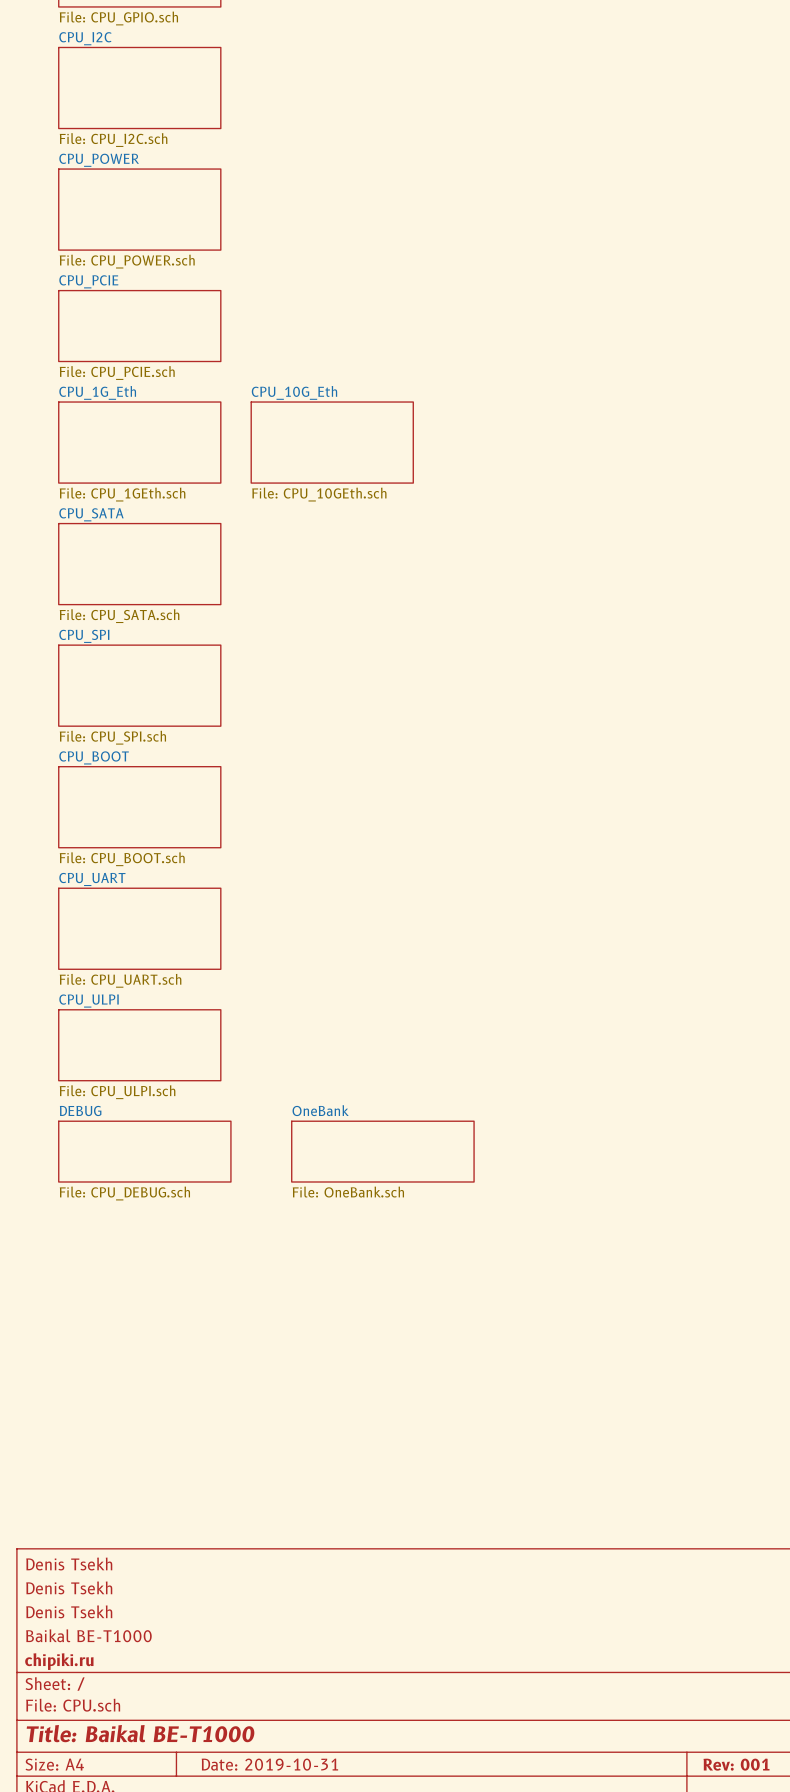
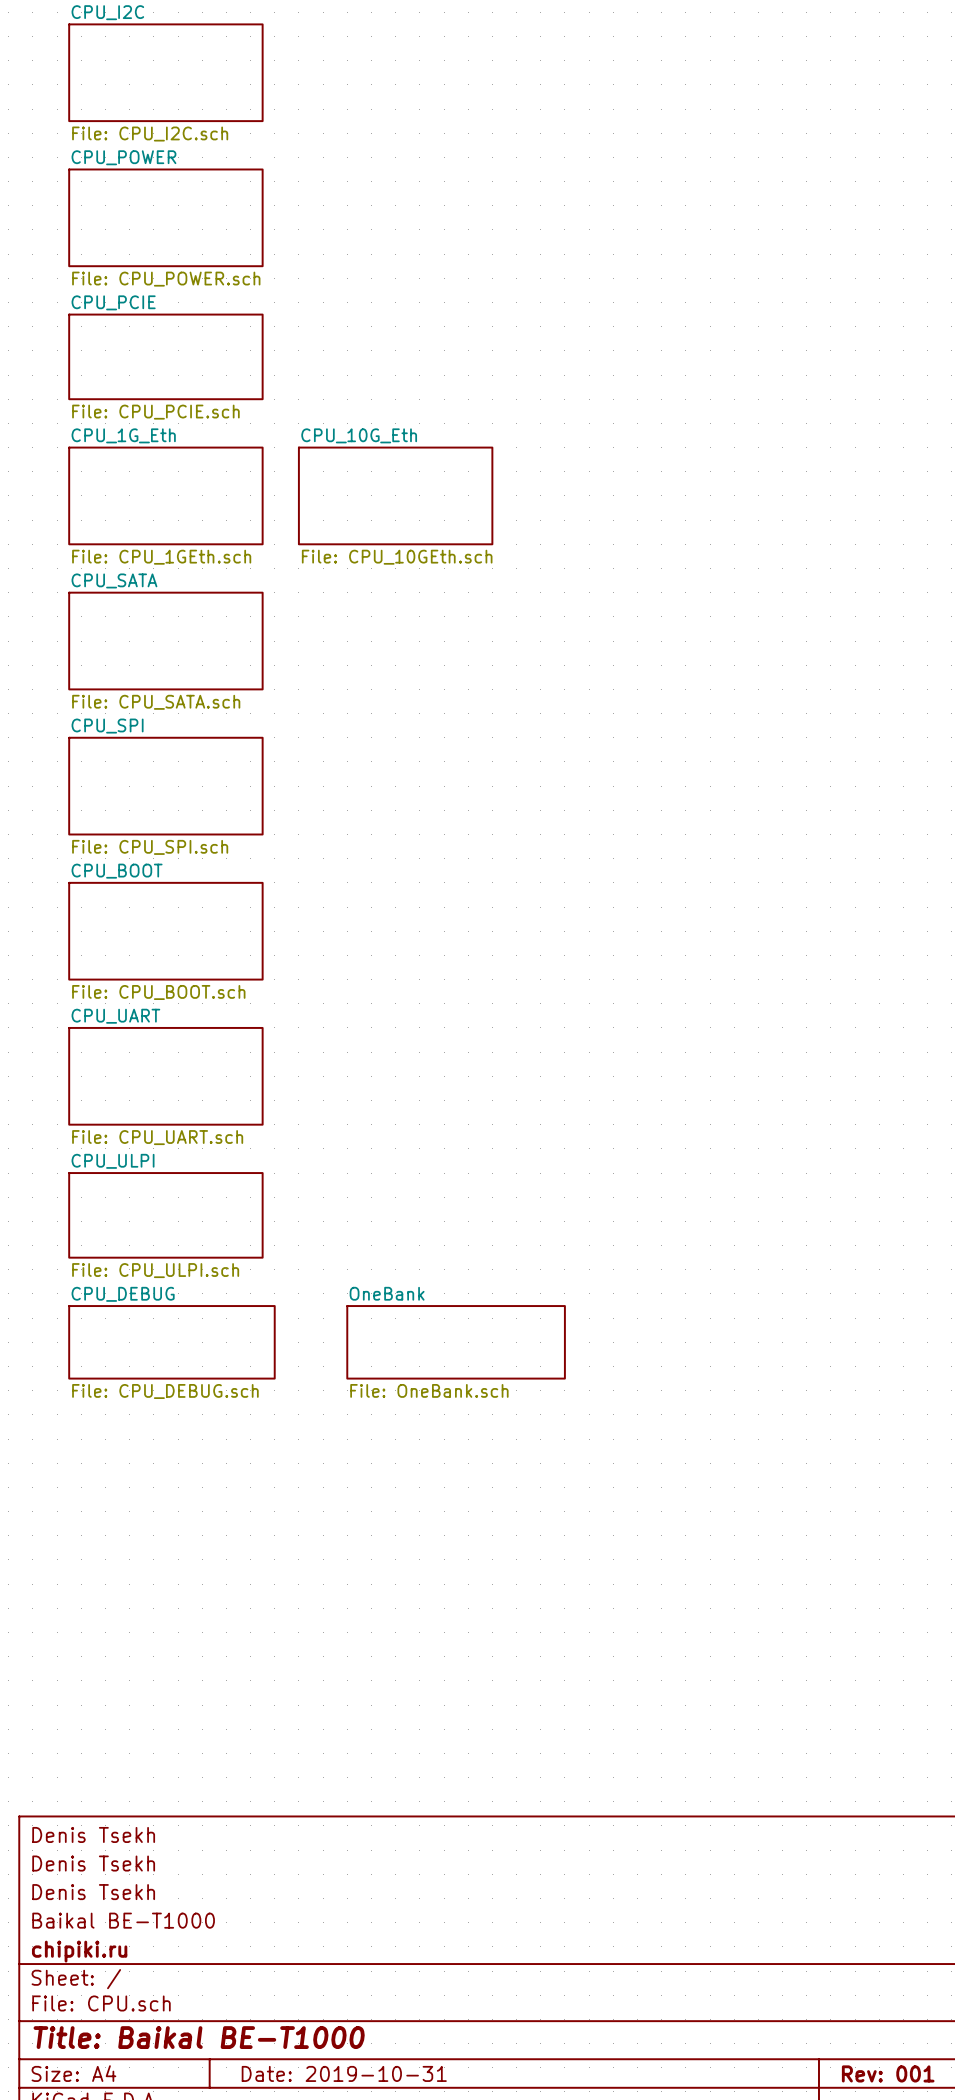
sheet DEBUG name: DEBUG (80, 1110) -> CPU_DEBUG (123, 1294)

